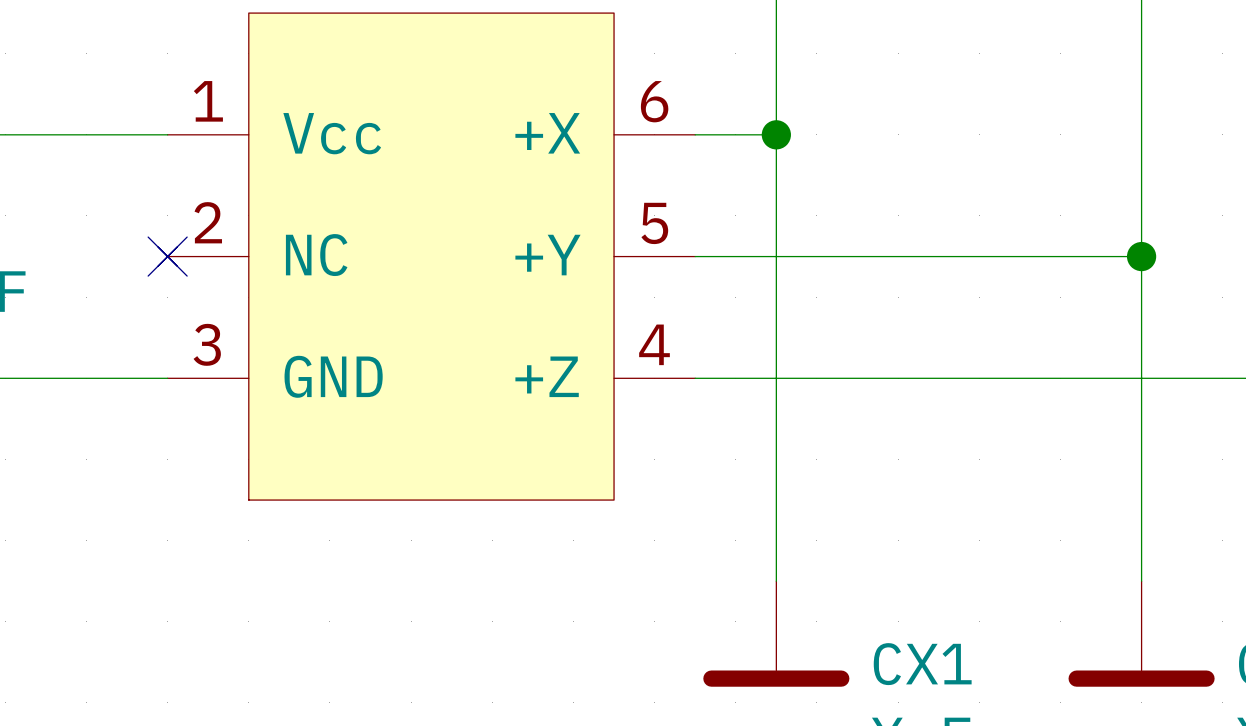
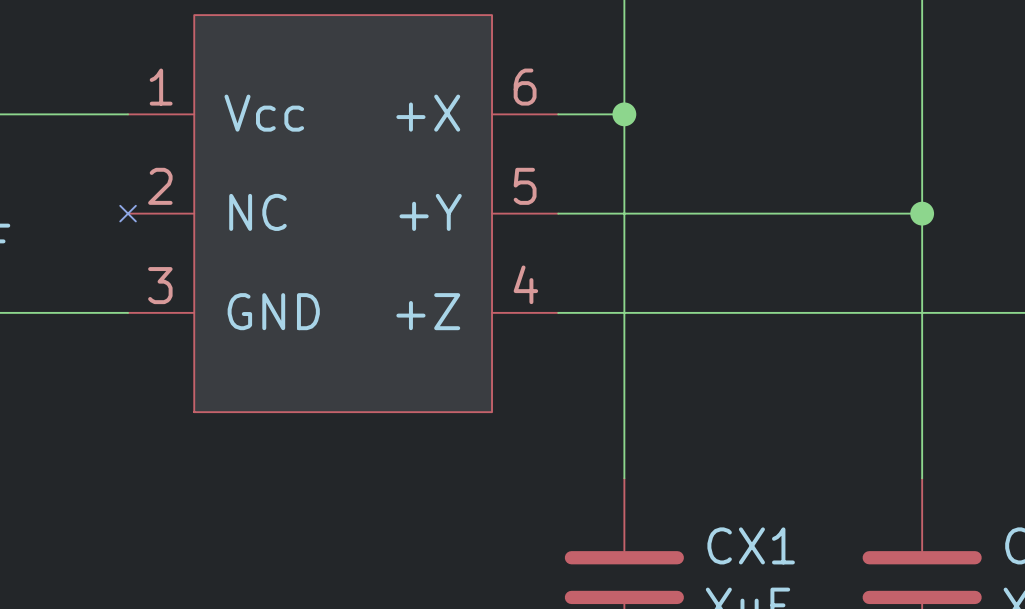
no-connect mark: (167, 256) -> none

